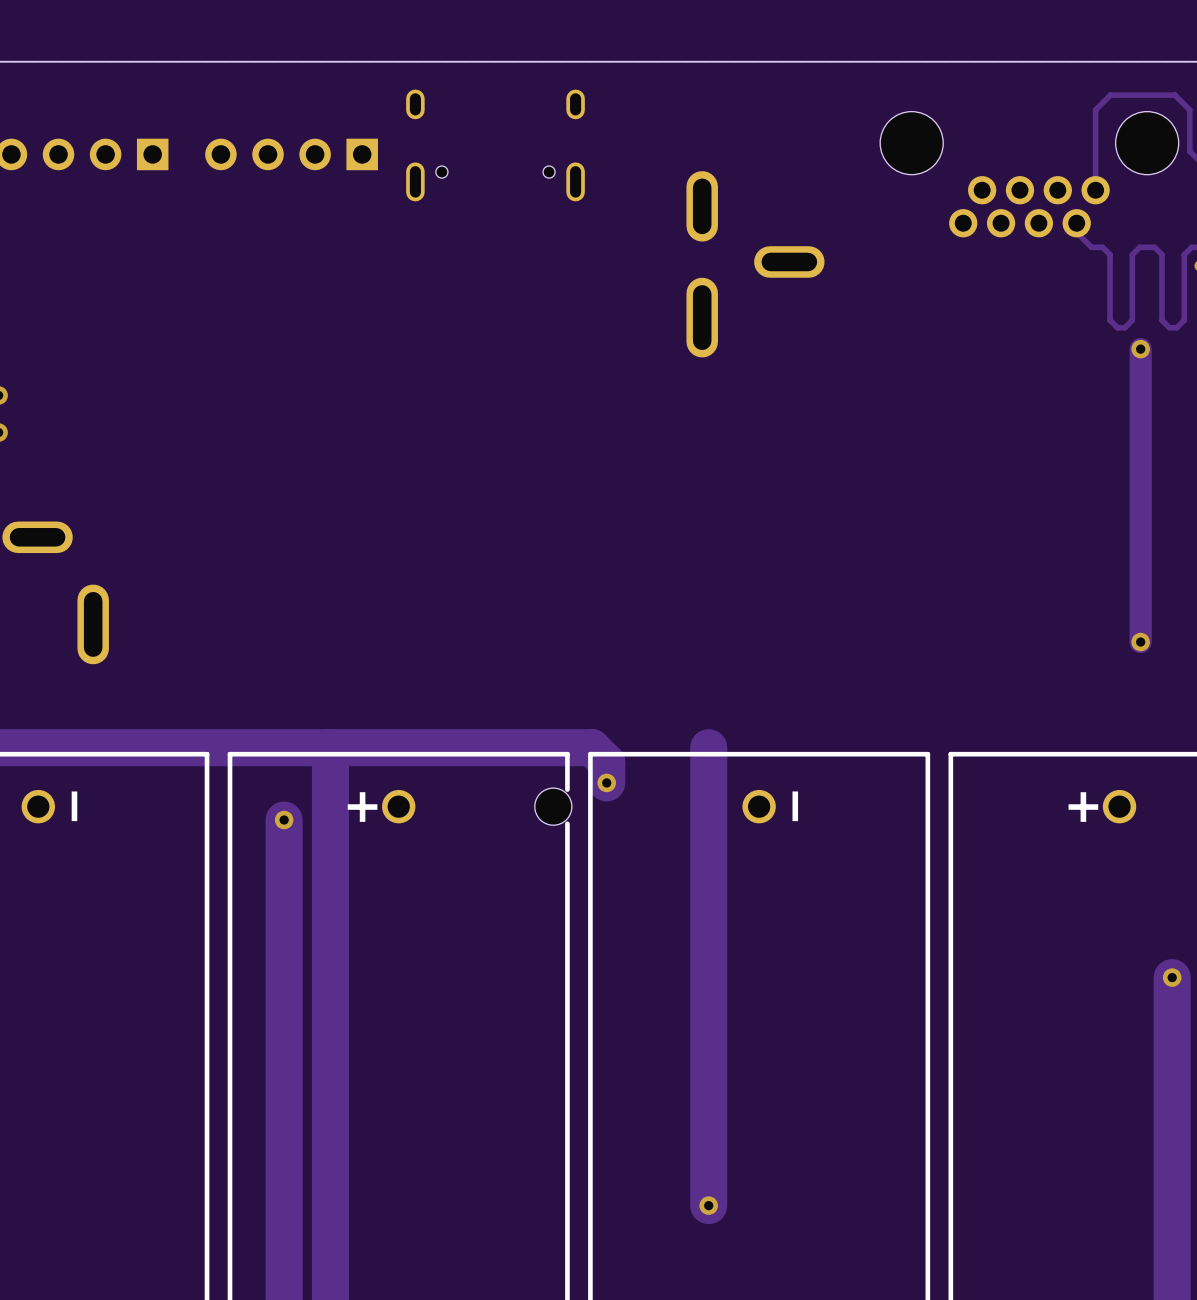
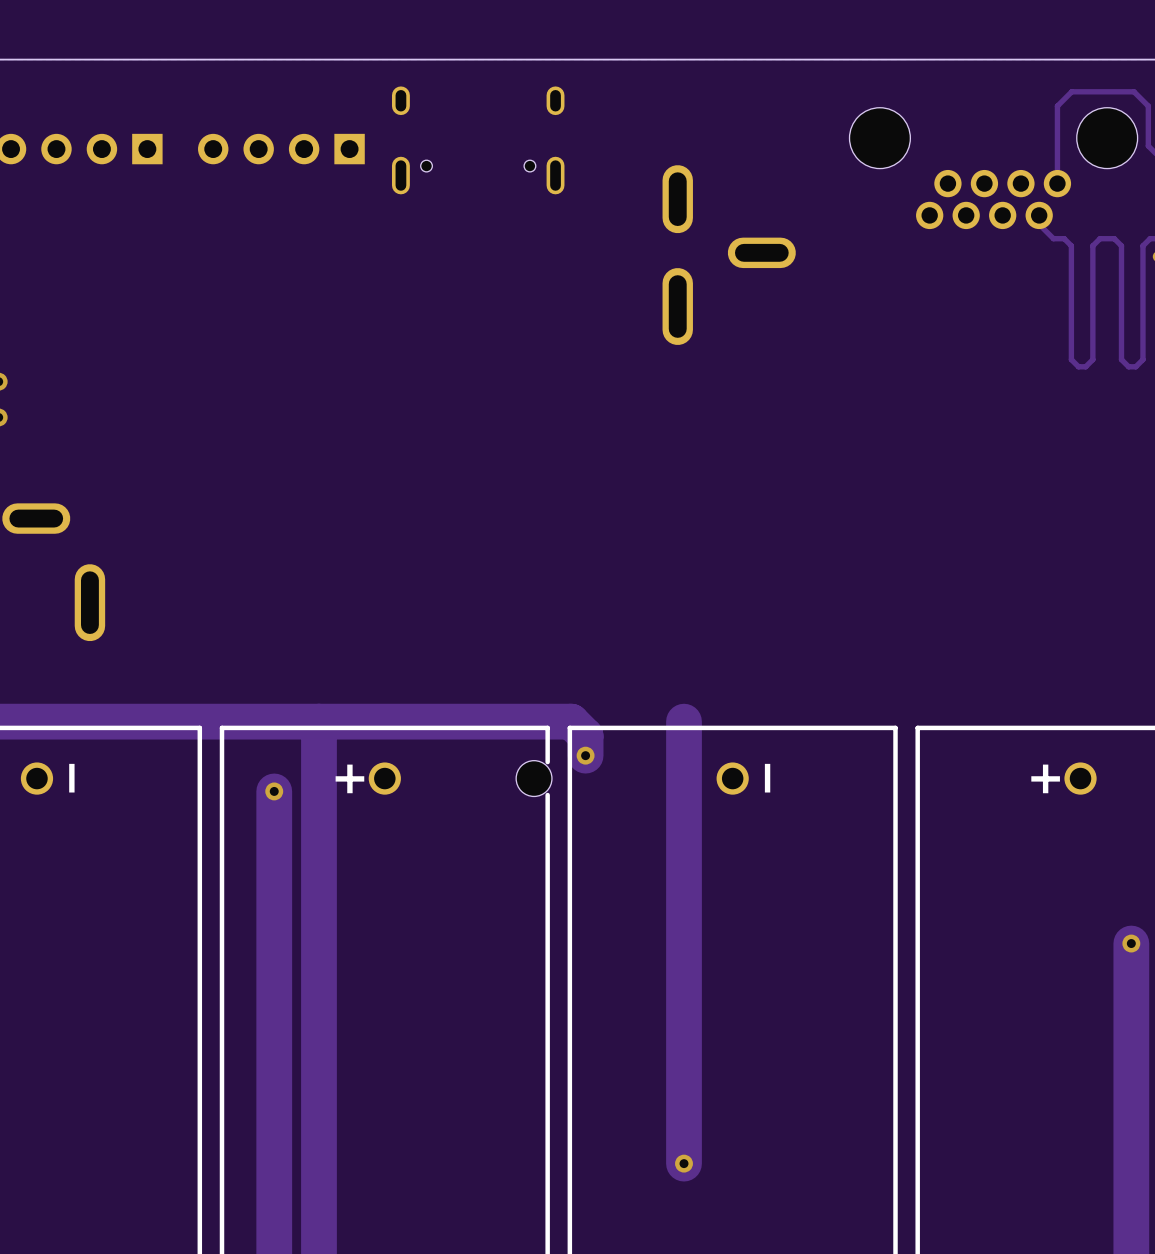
track: (1132, 320) (1124, 327) (1117, 327) (1110, 320) -> (1092, 309) (1092, 359) (1085, 366) (1078, 366) (1071, 359) (1071, 309)
track: (1184, 320) (1176, 327) (1169, 327) (1161, 320) -> (1142, 309) (1142, 359) (1135, 366) (1128, 366) (1121, 359) (1121, 309)
track: (1140, 349) (1140, 642) -> none
via: (1140, 349) -> none
via: (1140, 642) -> none

